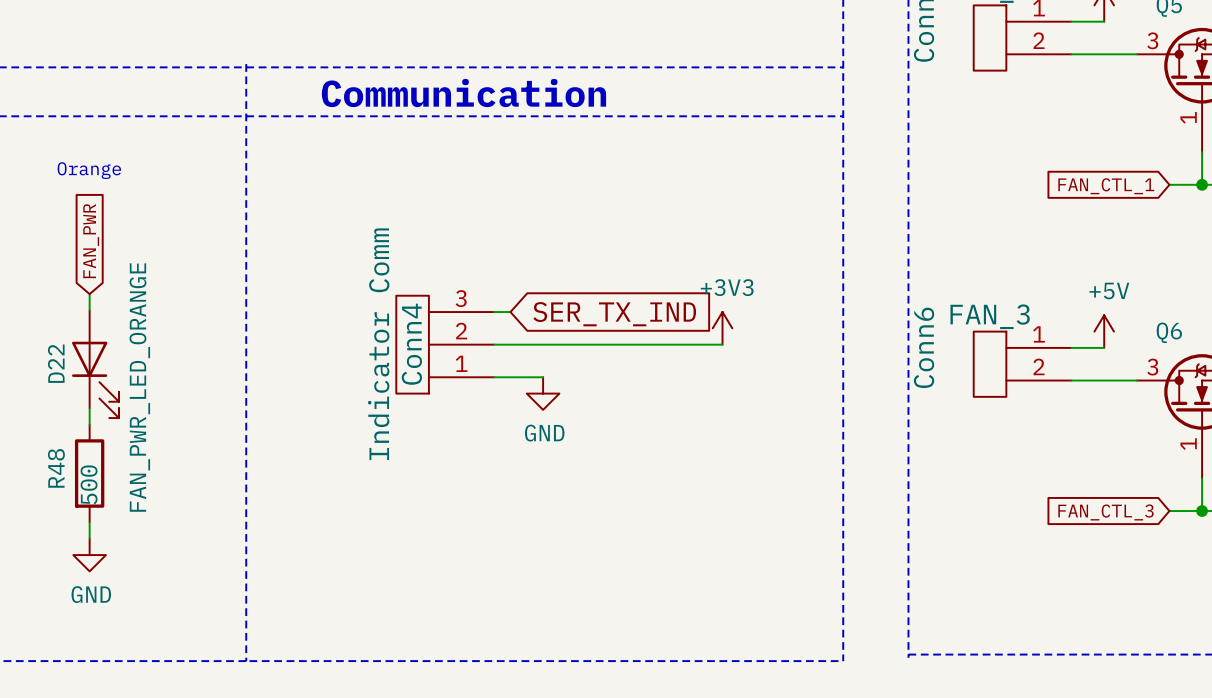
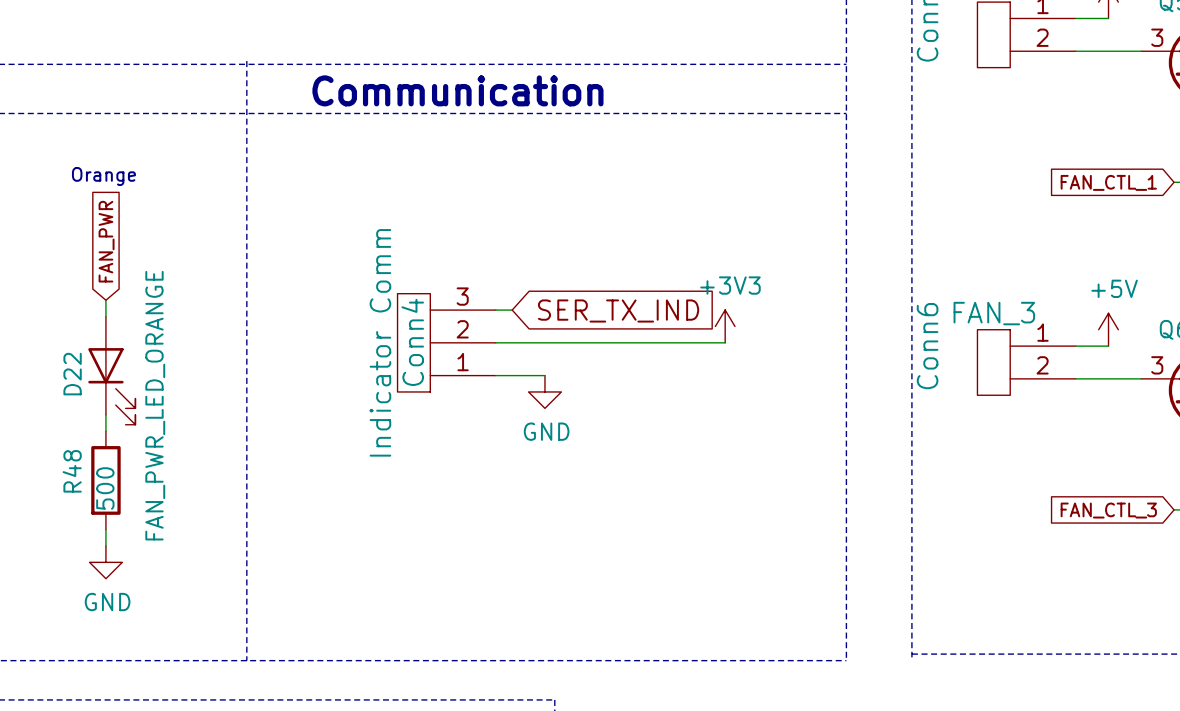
text position: Orange (89, 170) -> Orange (103, 176)
global label position: FAN_PWR (91, 241) -> FAN_PWR (106, 241)
wire: (89, 294) (89, 310) -> (105, 300) (105, 316)
D22 position: (95, 364) -> (111, 370)
wire: (89, 408) (89, 424) -> (105, 414) (105, 431)
R48 position: (89, 473) -> (105, 480)
wire: (89, 522) (89, 538) -> (105, 529) (105, 545)
power symbol position: GND (89, 555) -> GND (105, 562)

